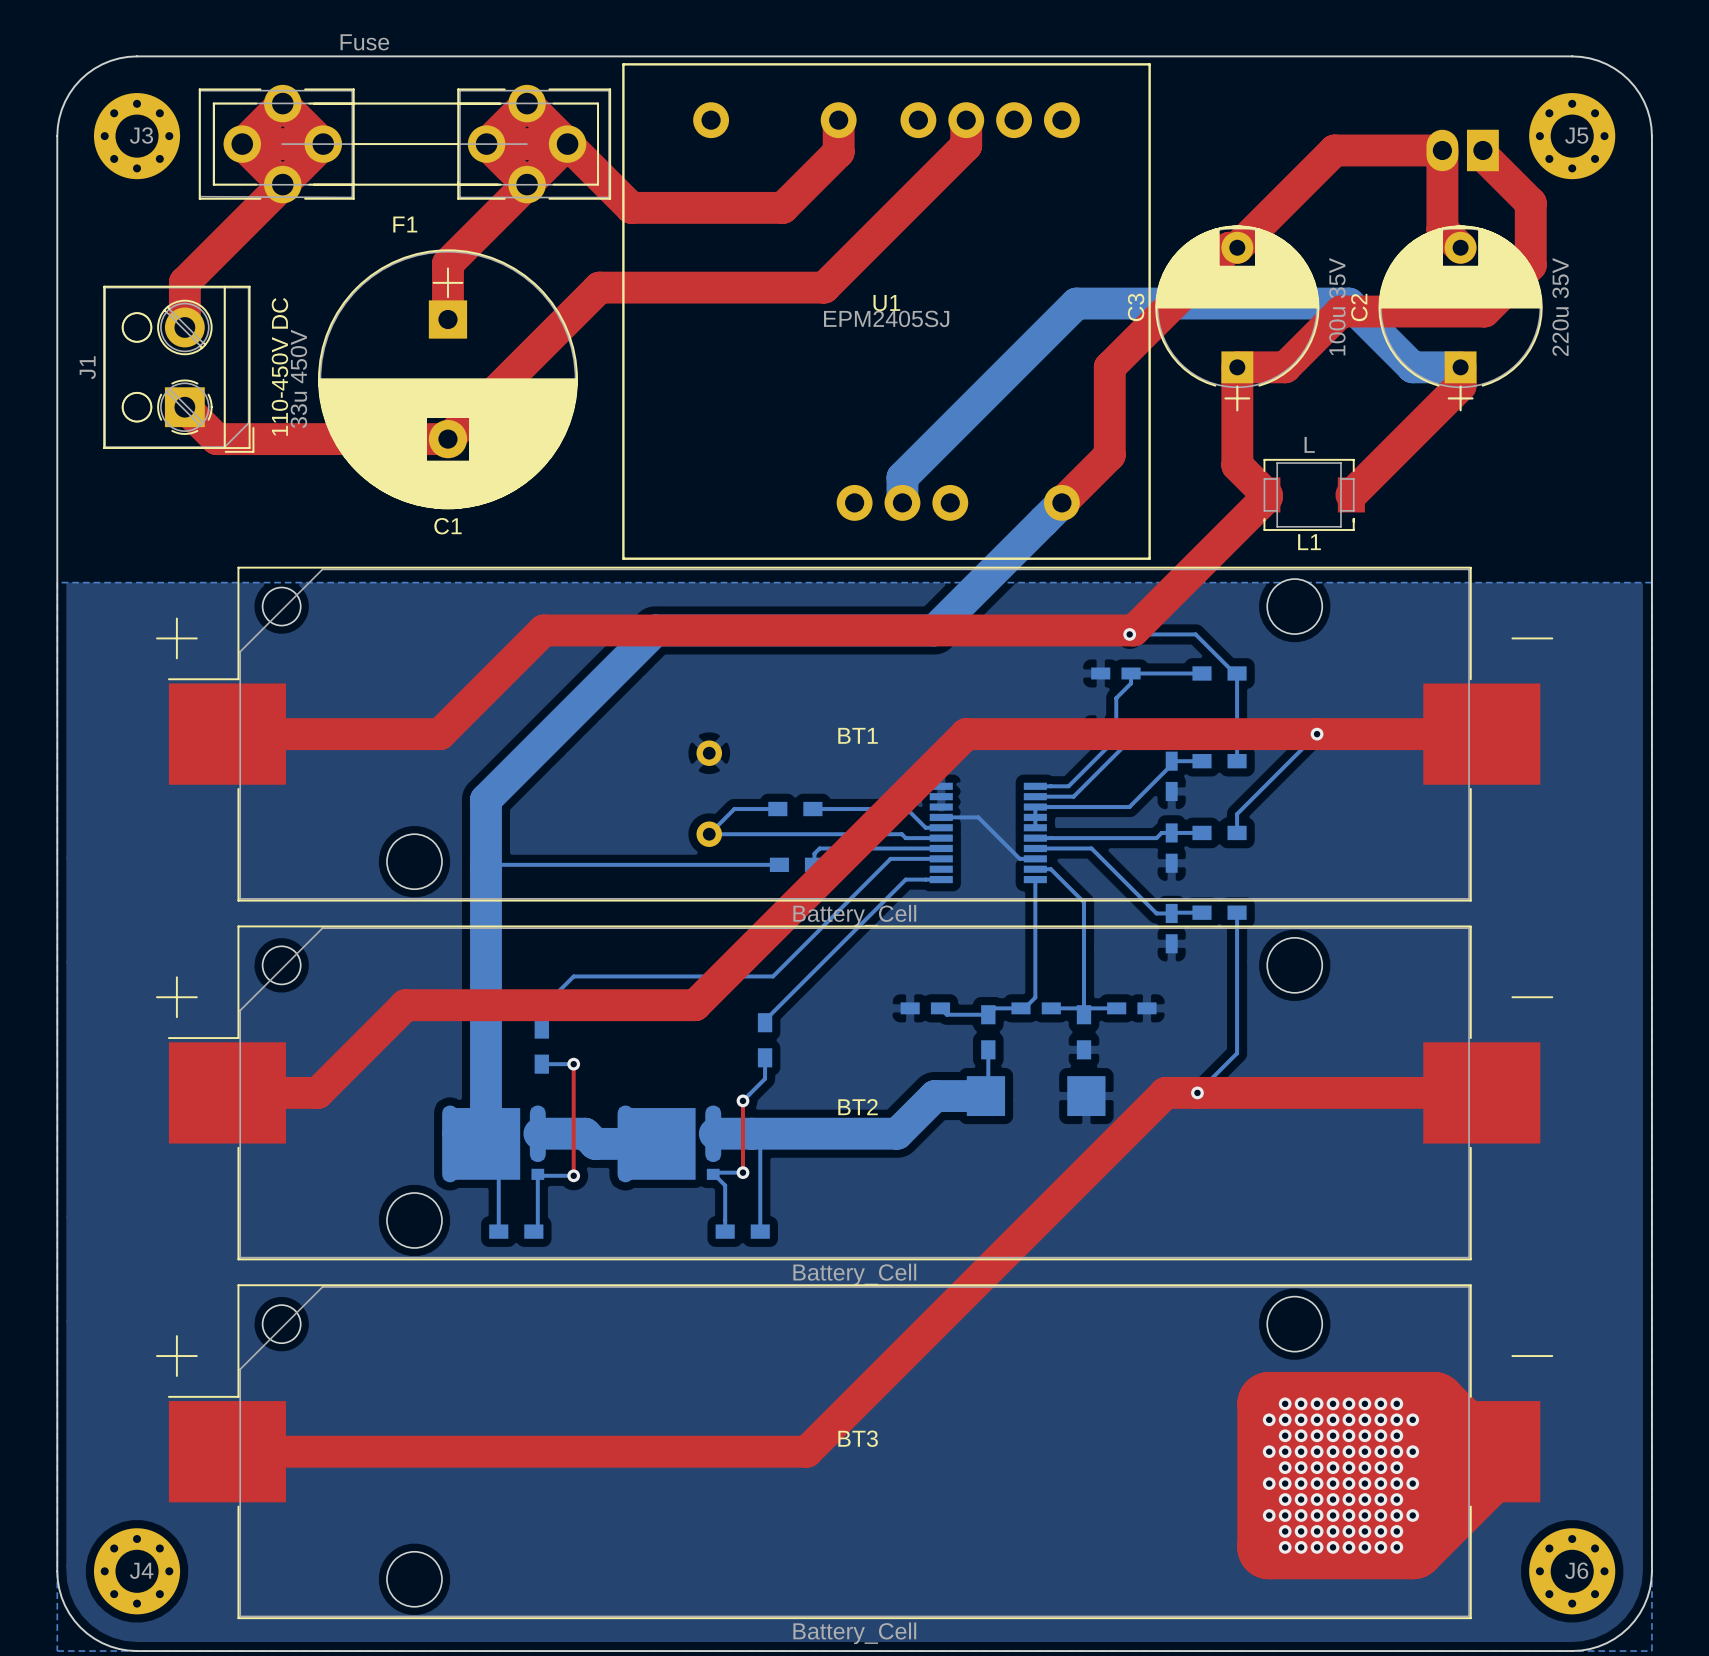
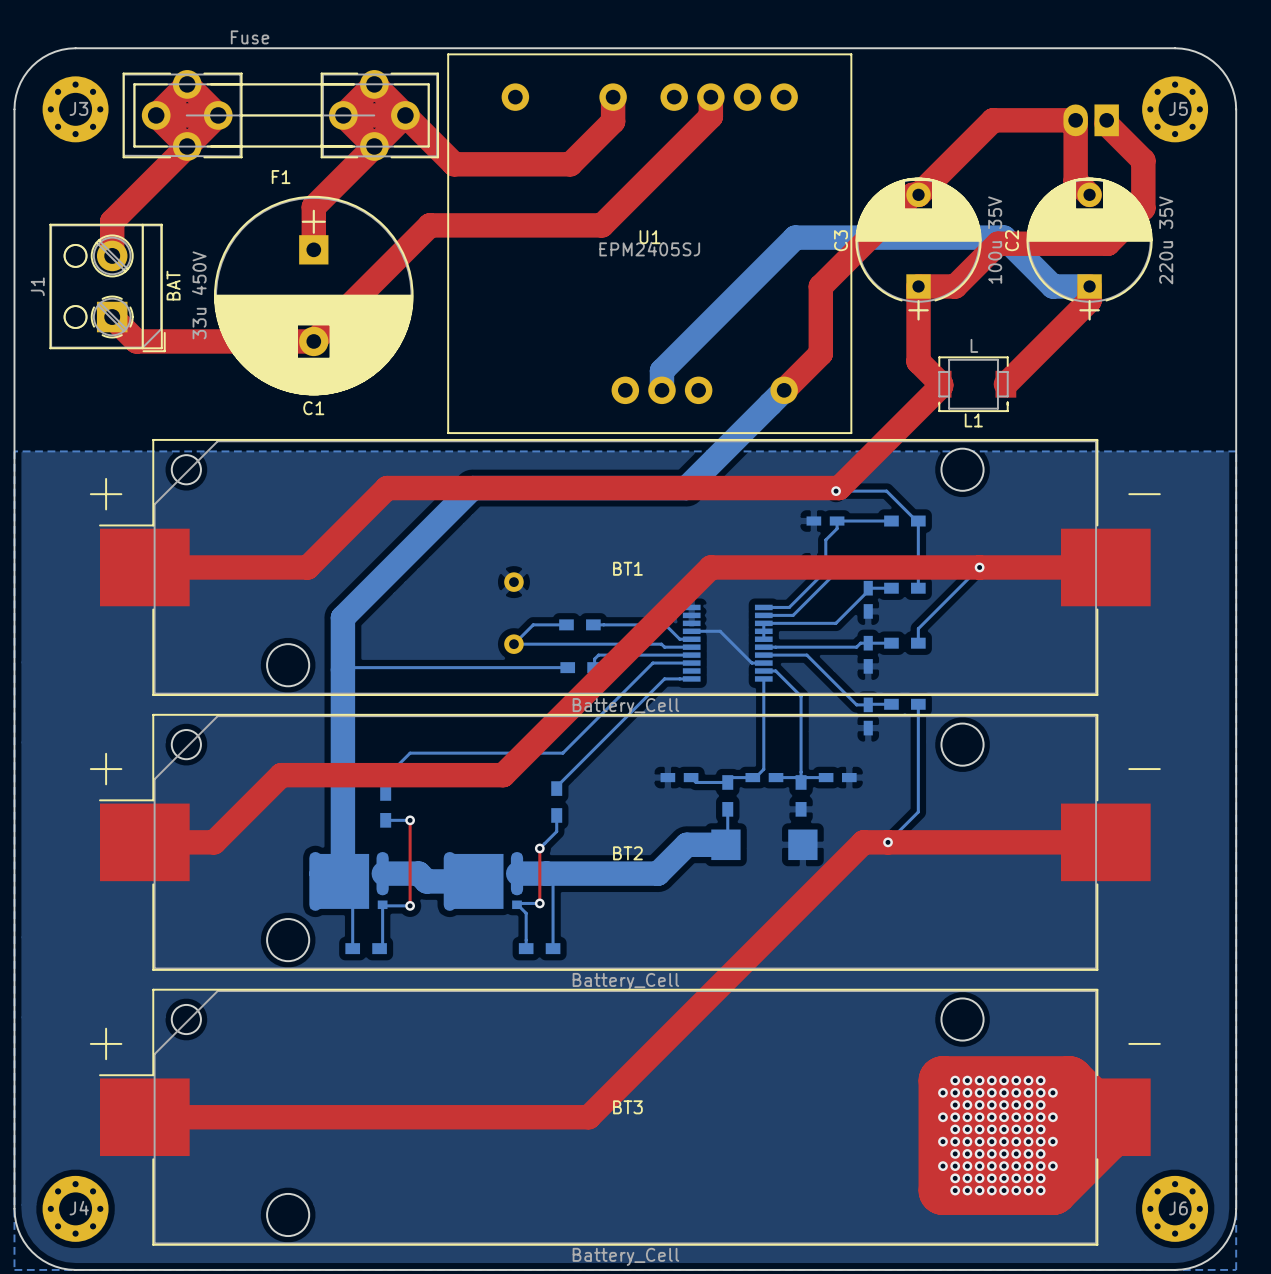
J1 value: 110-450V DC (279, 366) -> BAT (173, 285)

